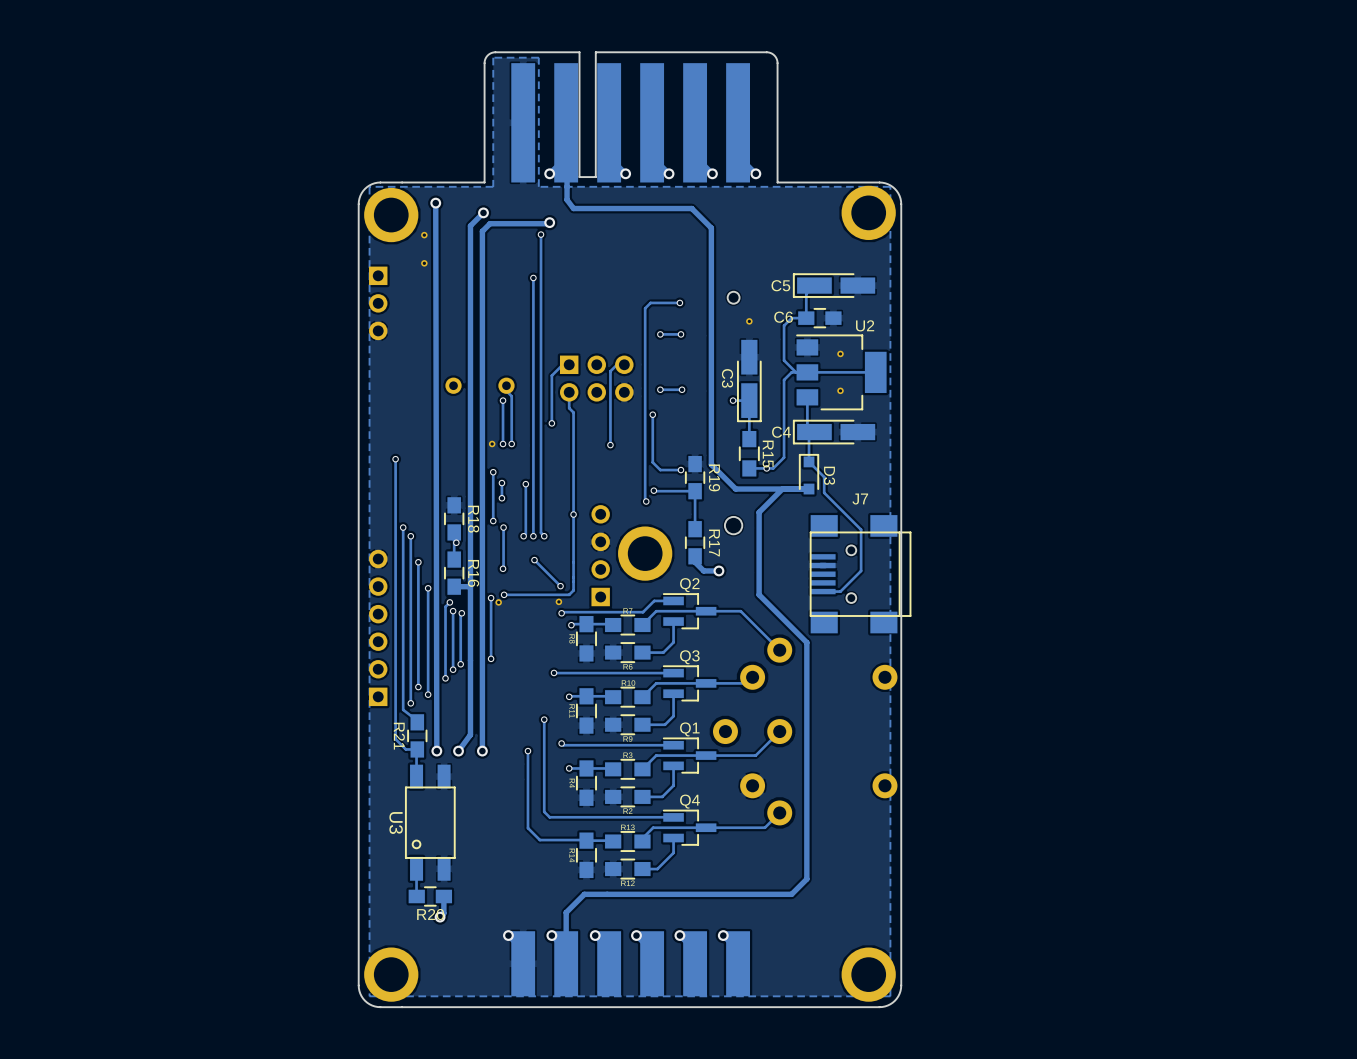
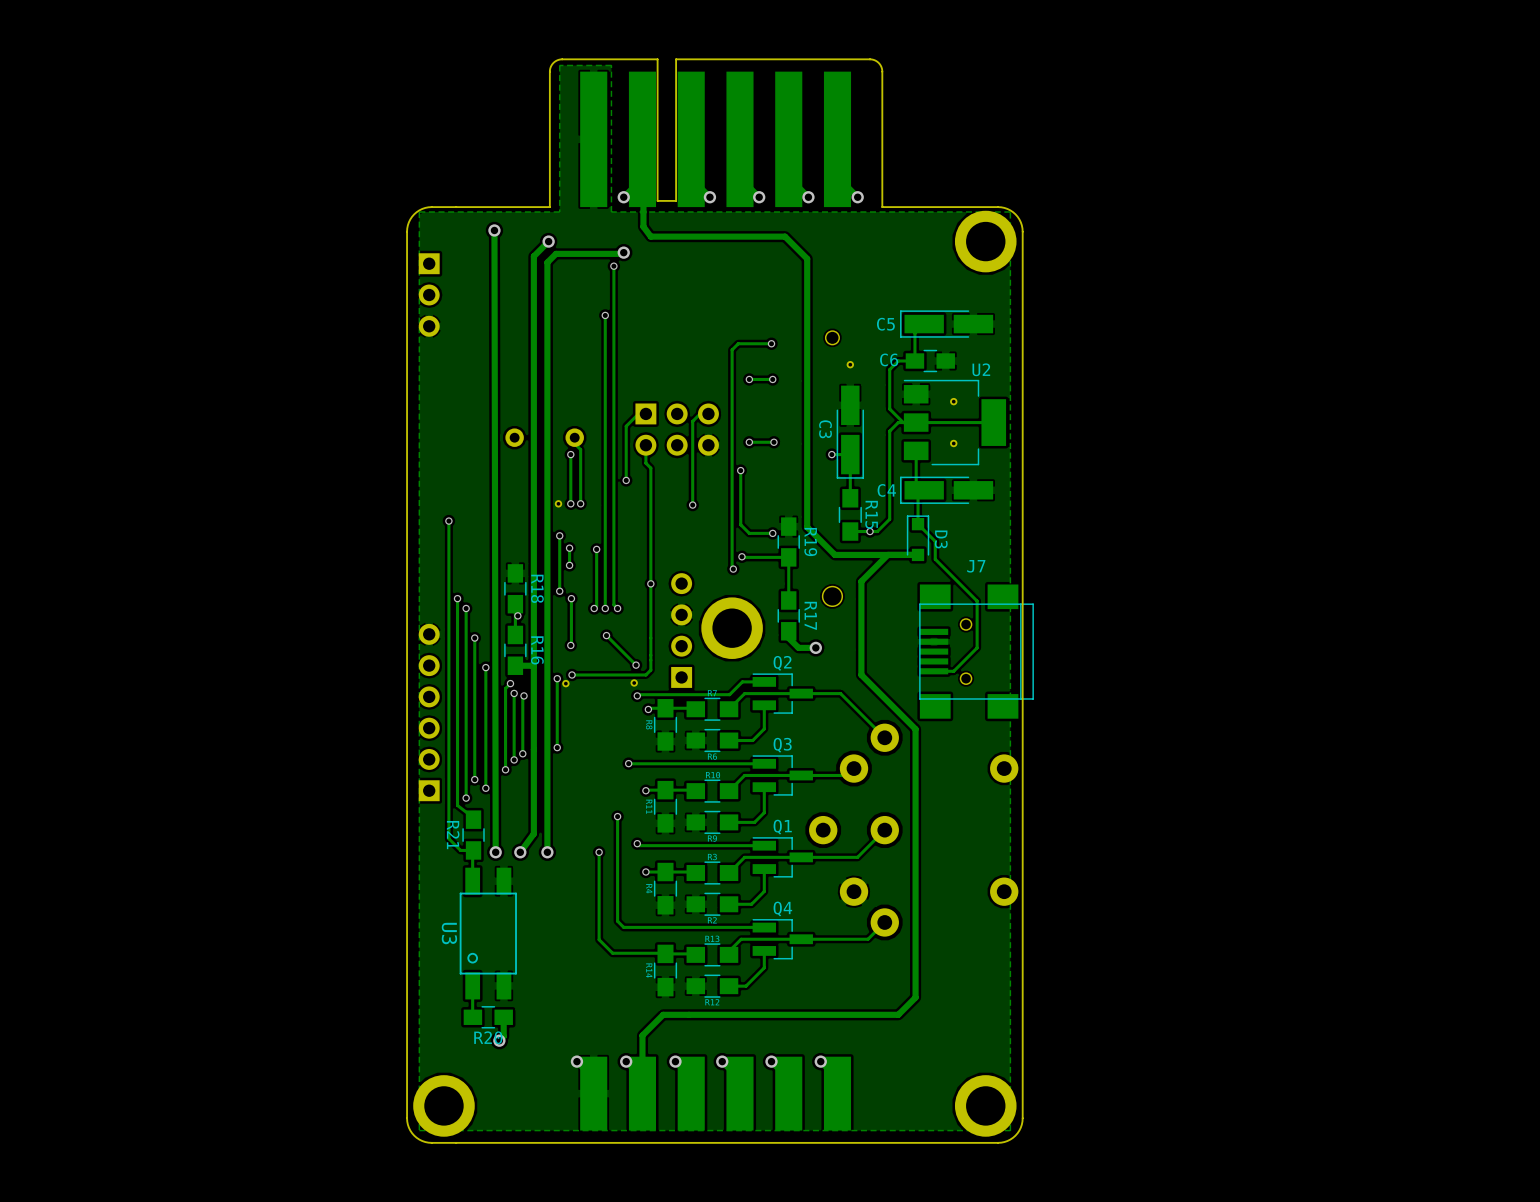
part: (391, 215) -> none
part: (424, 235) -> none
part: (424, 263) -> none
part position: (378, 303) -> (429, 295)

